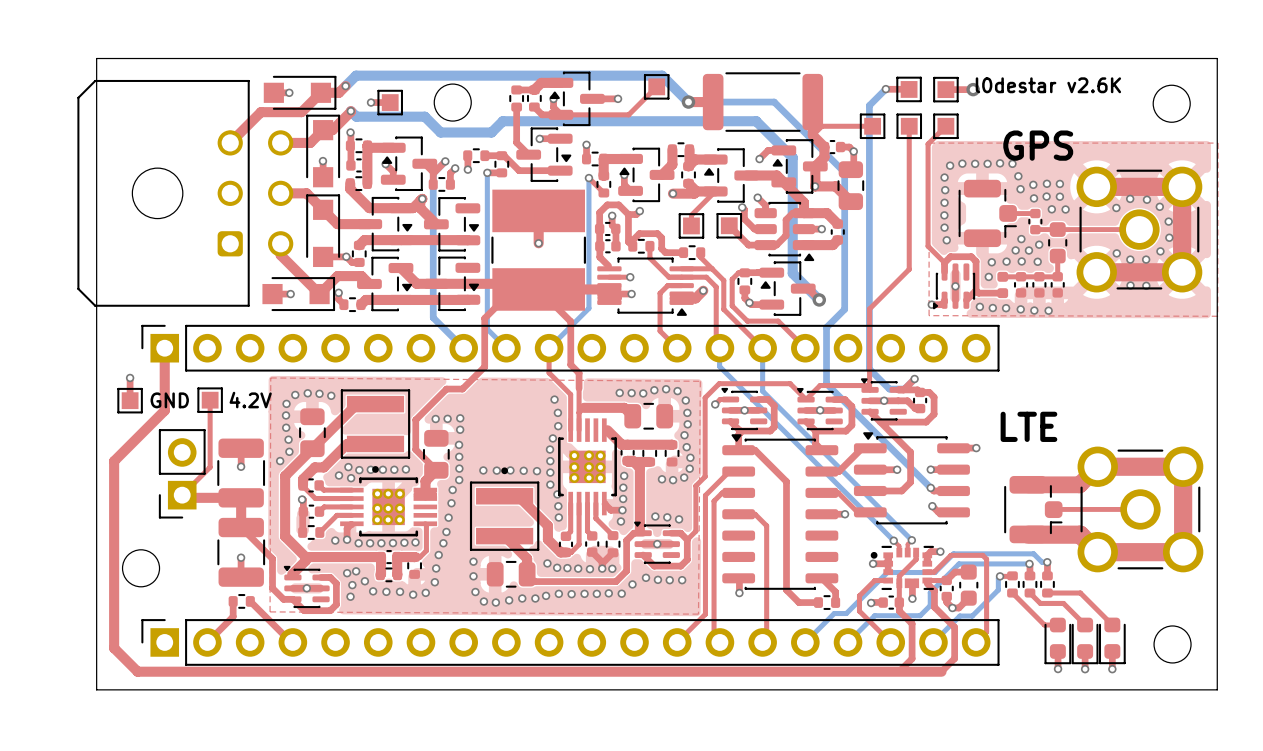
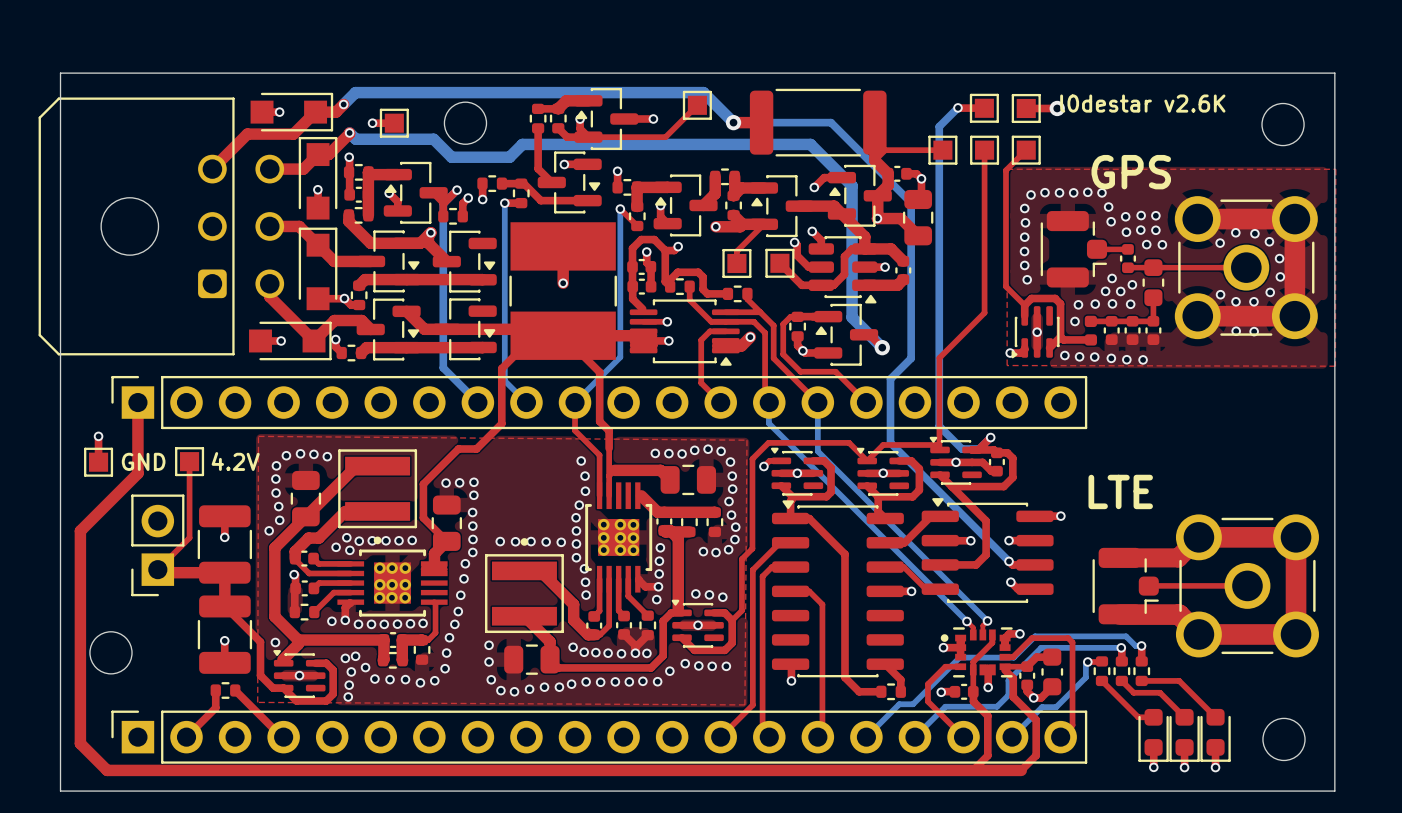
via: none -> (275, 642)
via: none -> (348, 696)

